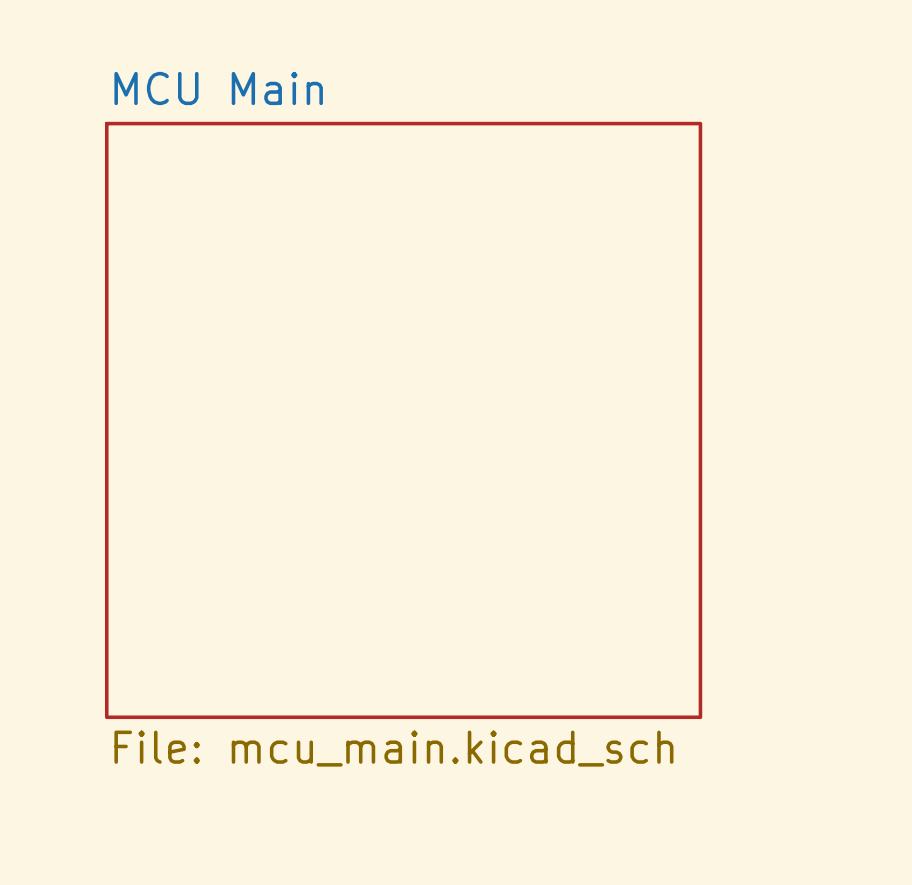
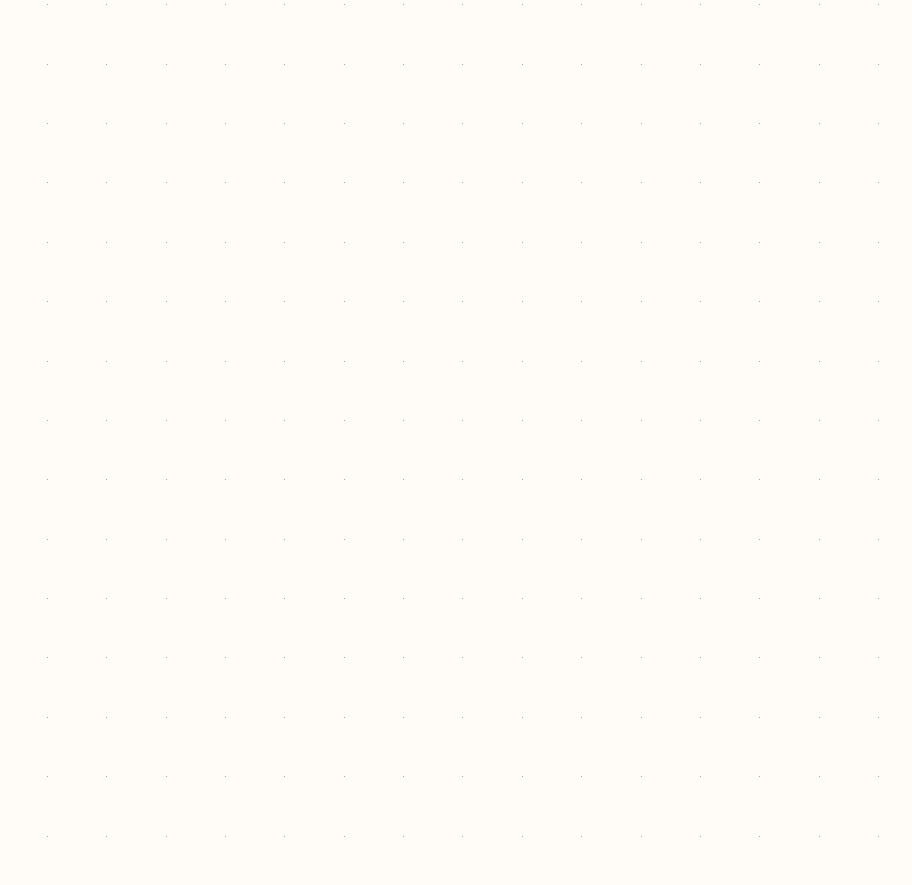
sheet MCU Main: File: mcu_main.kicad_sch (403, 420) -> none

